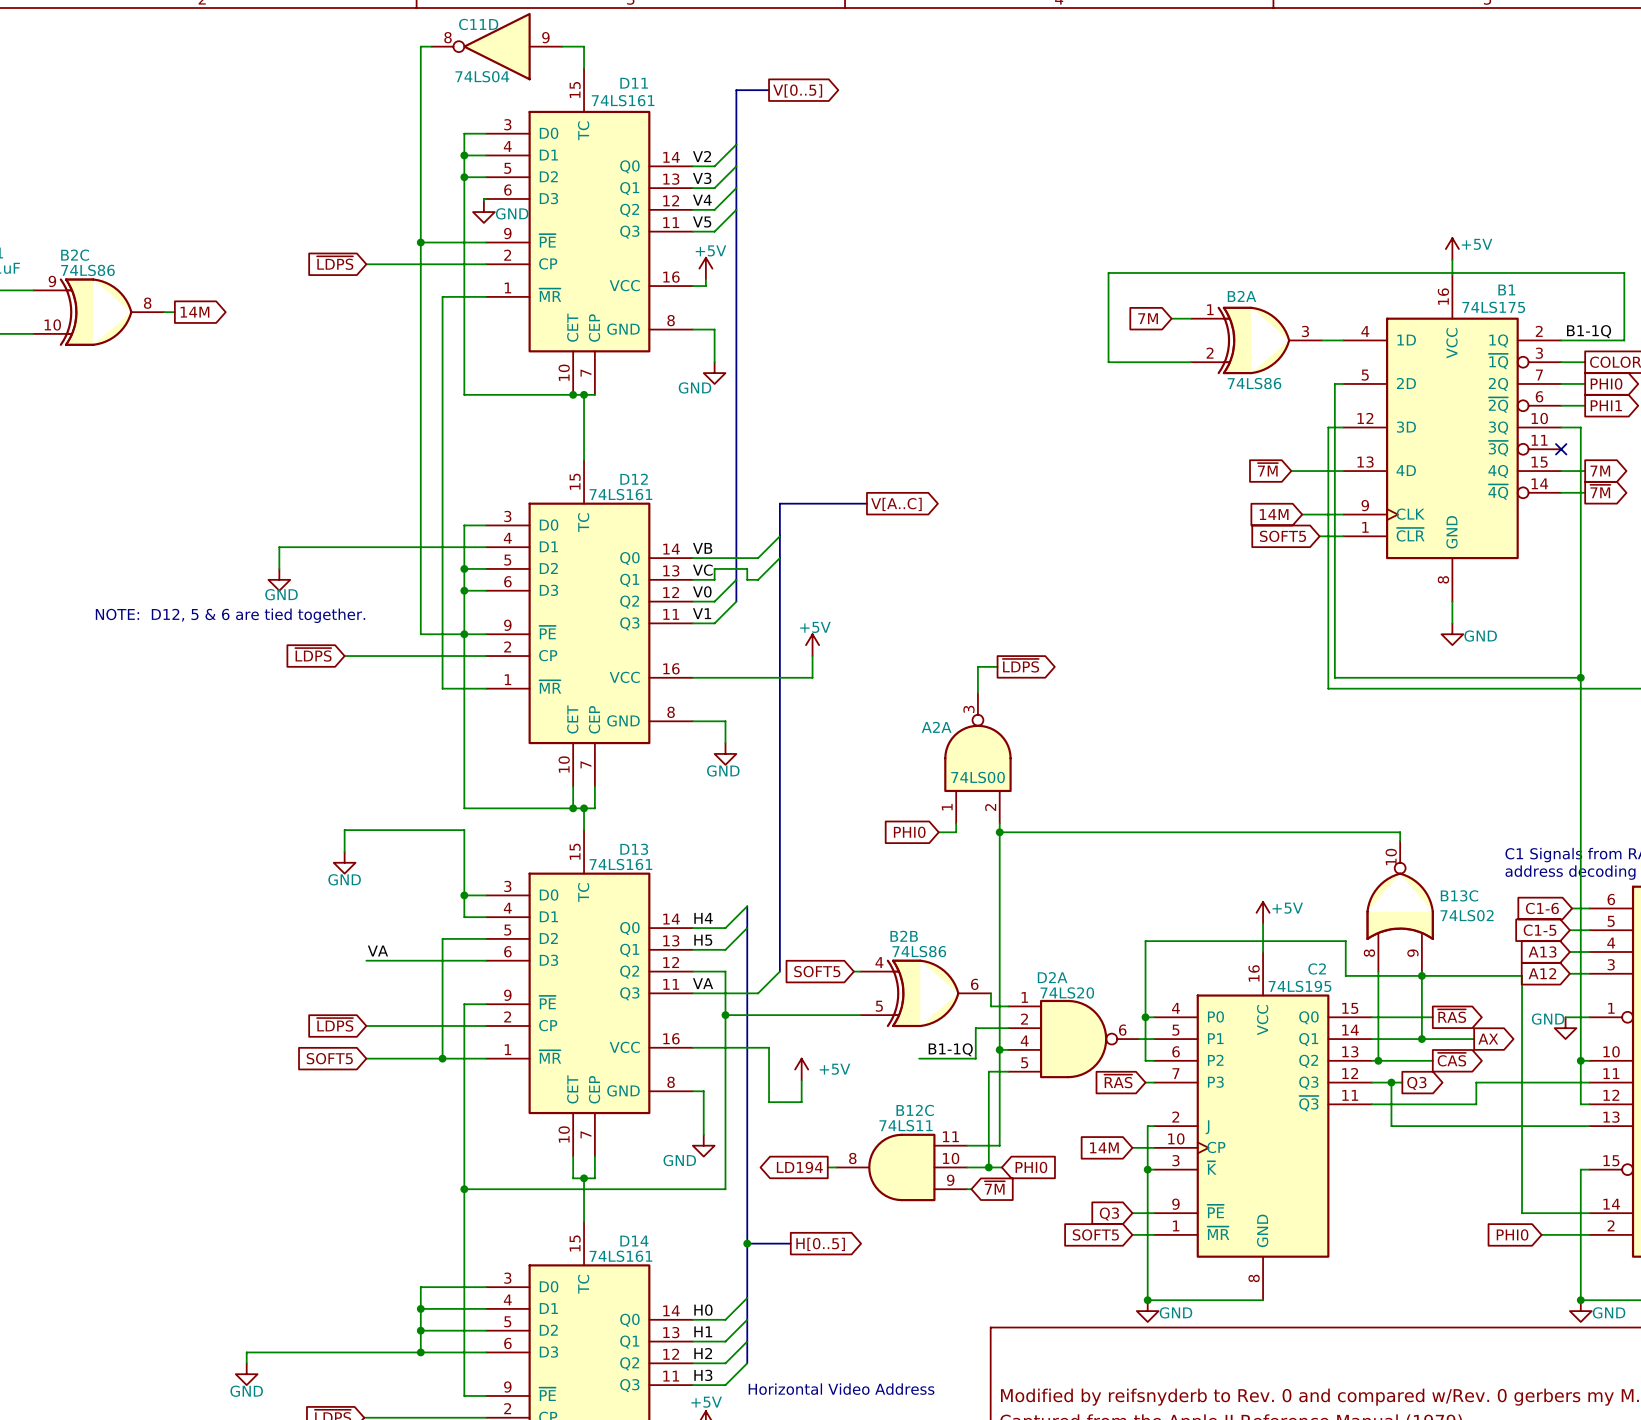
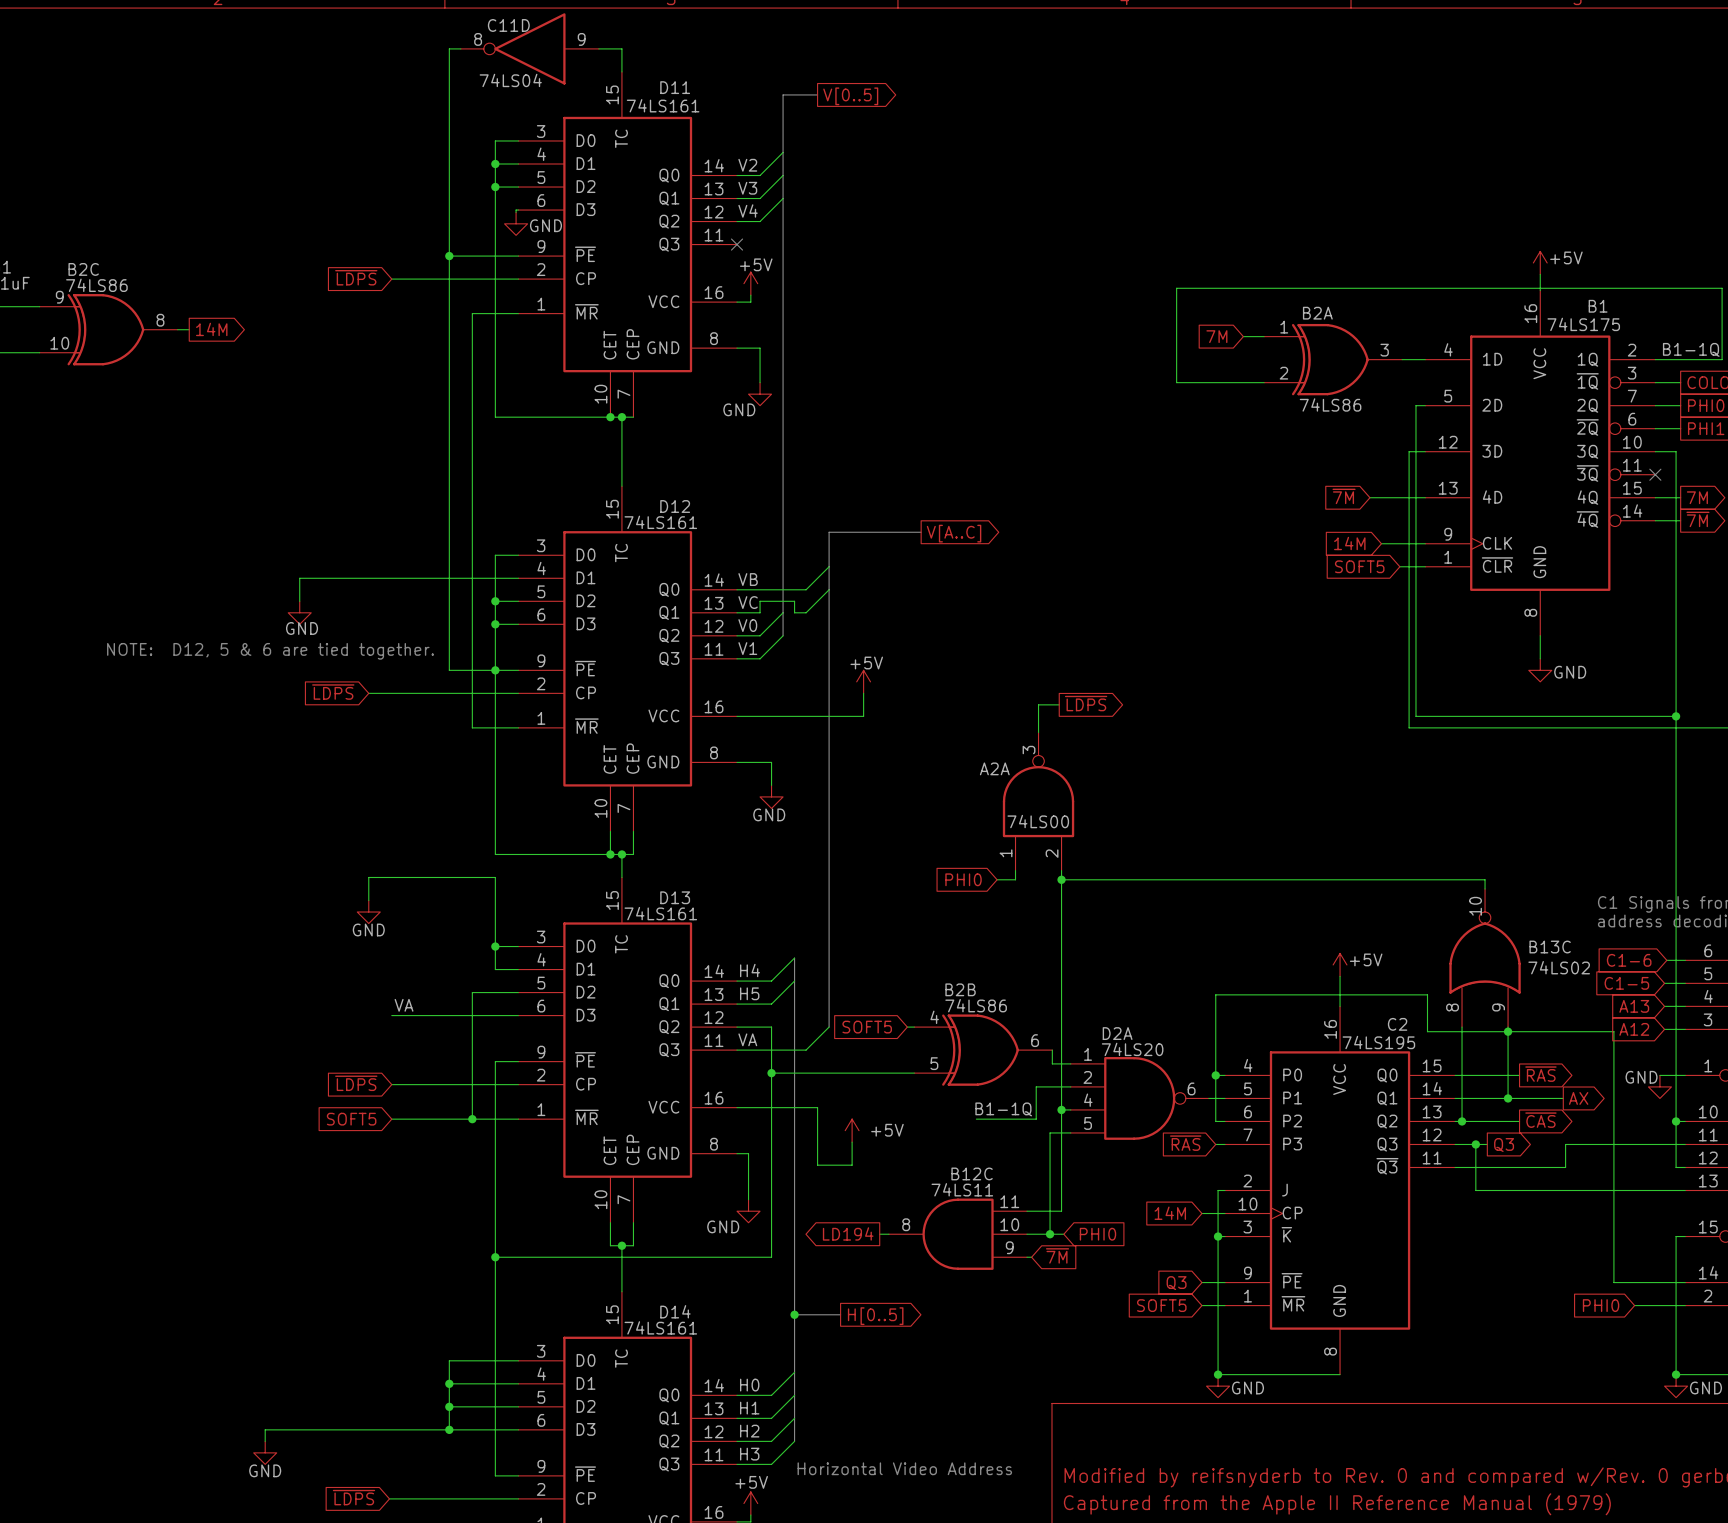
wire: (736, 209) (714, 231) (692, 231) -> none
label: V5 (702, 222) -> none
no-connect mark: none -> (737, 244)

